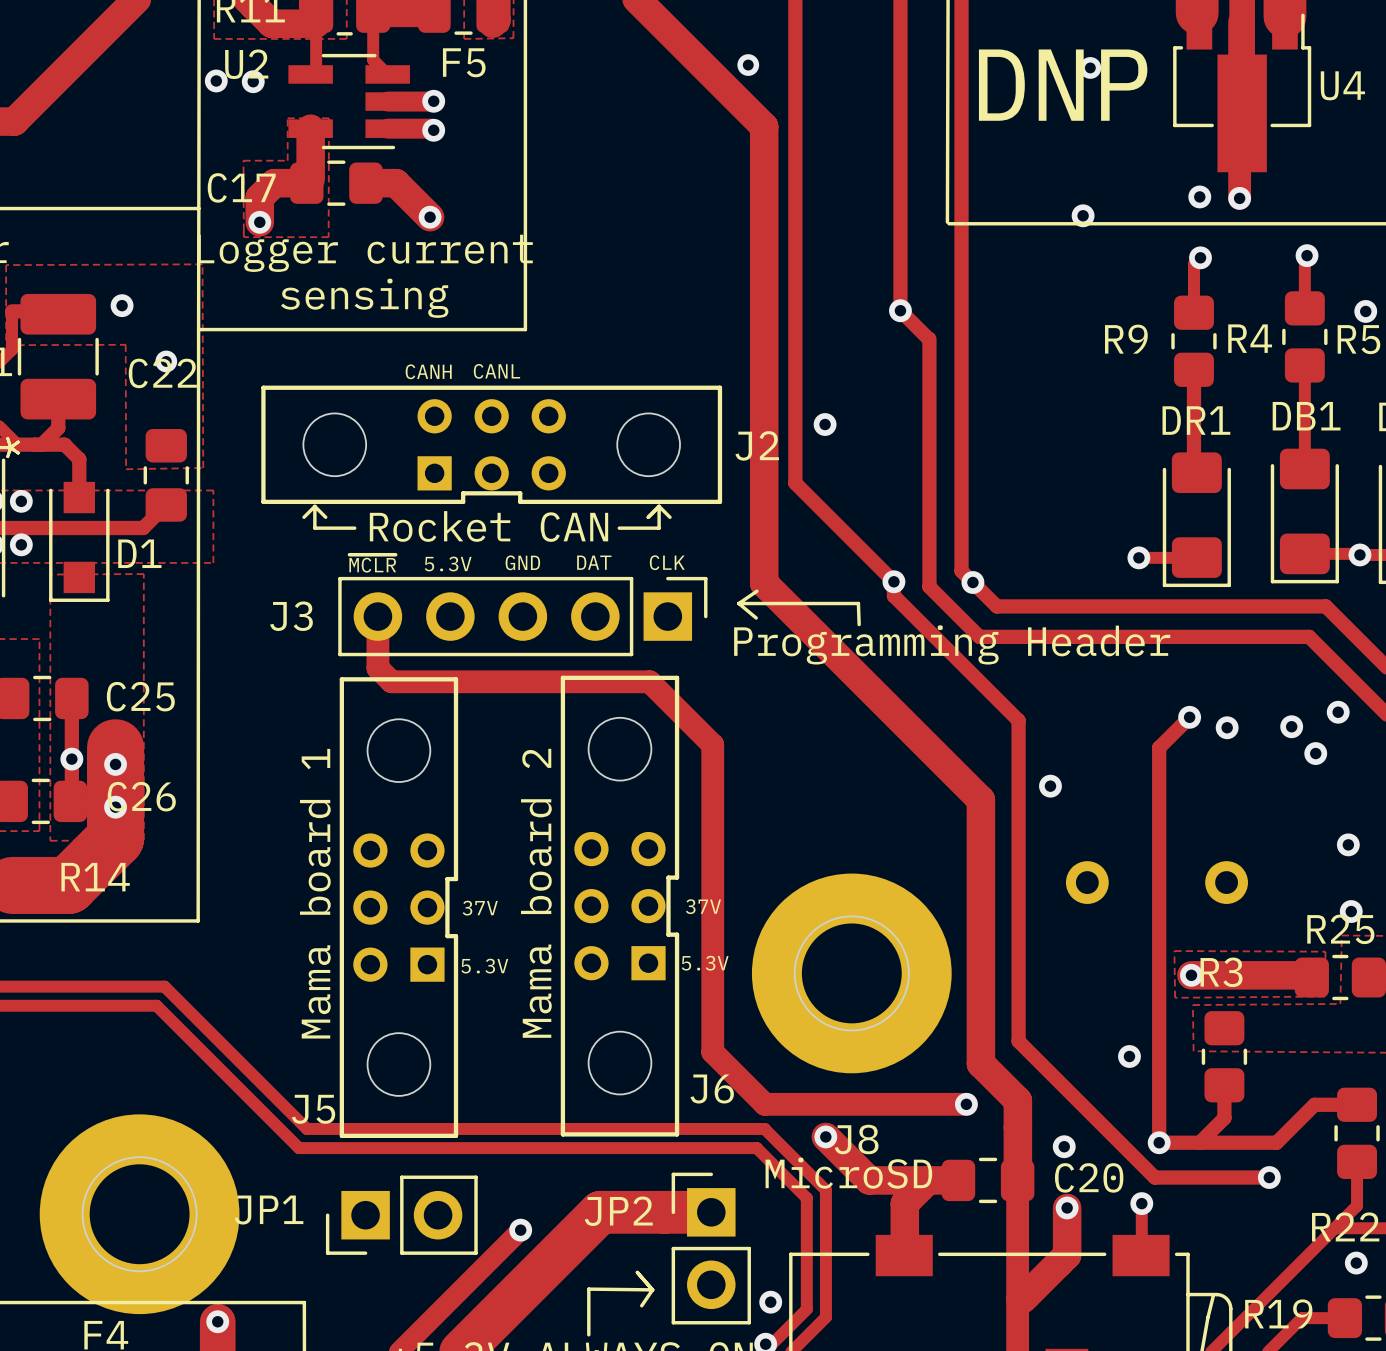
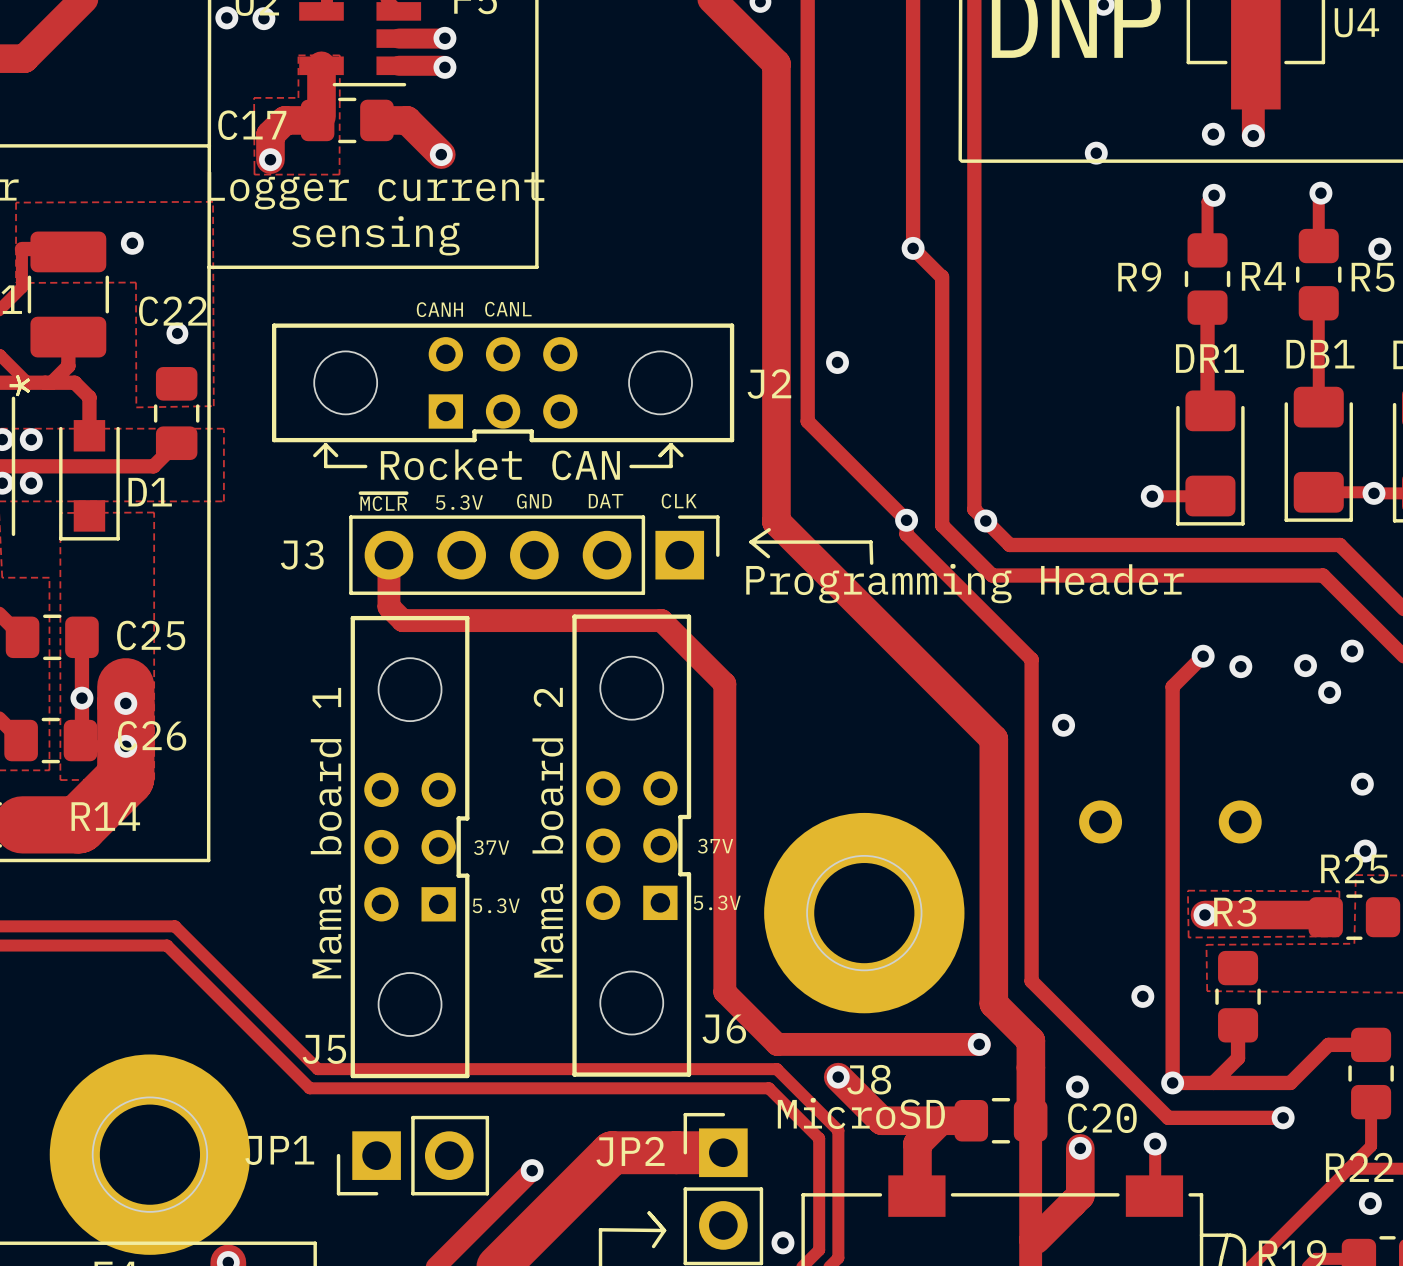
via position: (166, 361) -> (177, 333)

